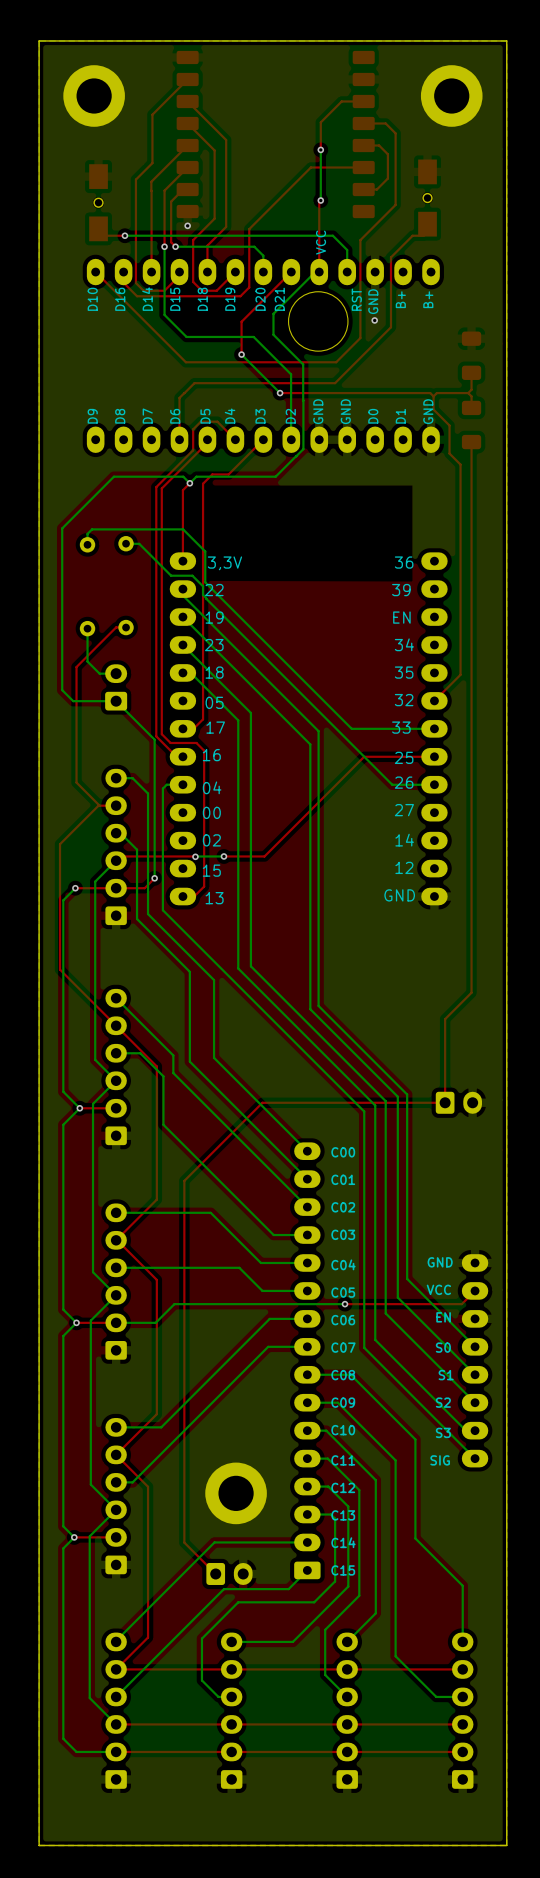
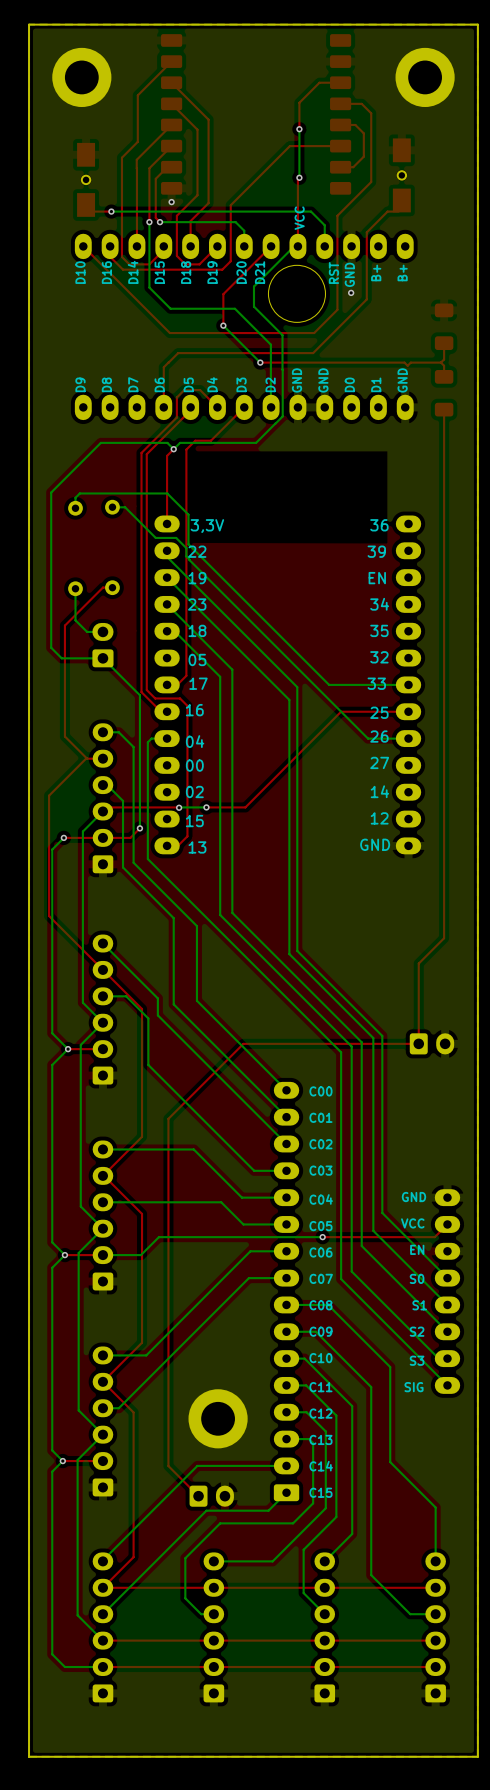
top track: (433, 396) (433, 409) (449, 425) (449, 453) (460, 464) (460, 674) (434, 700) -> none

